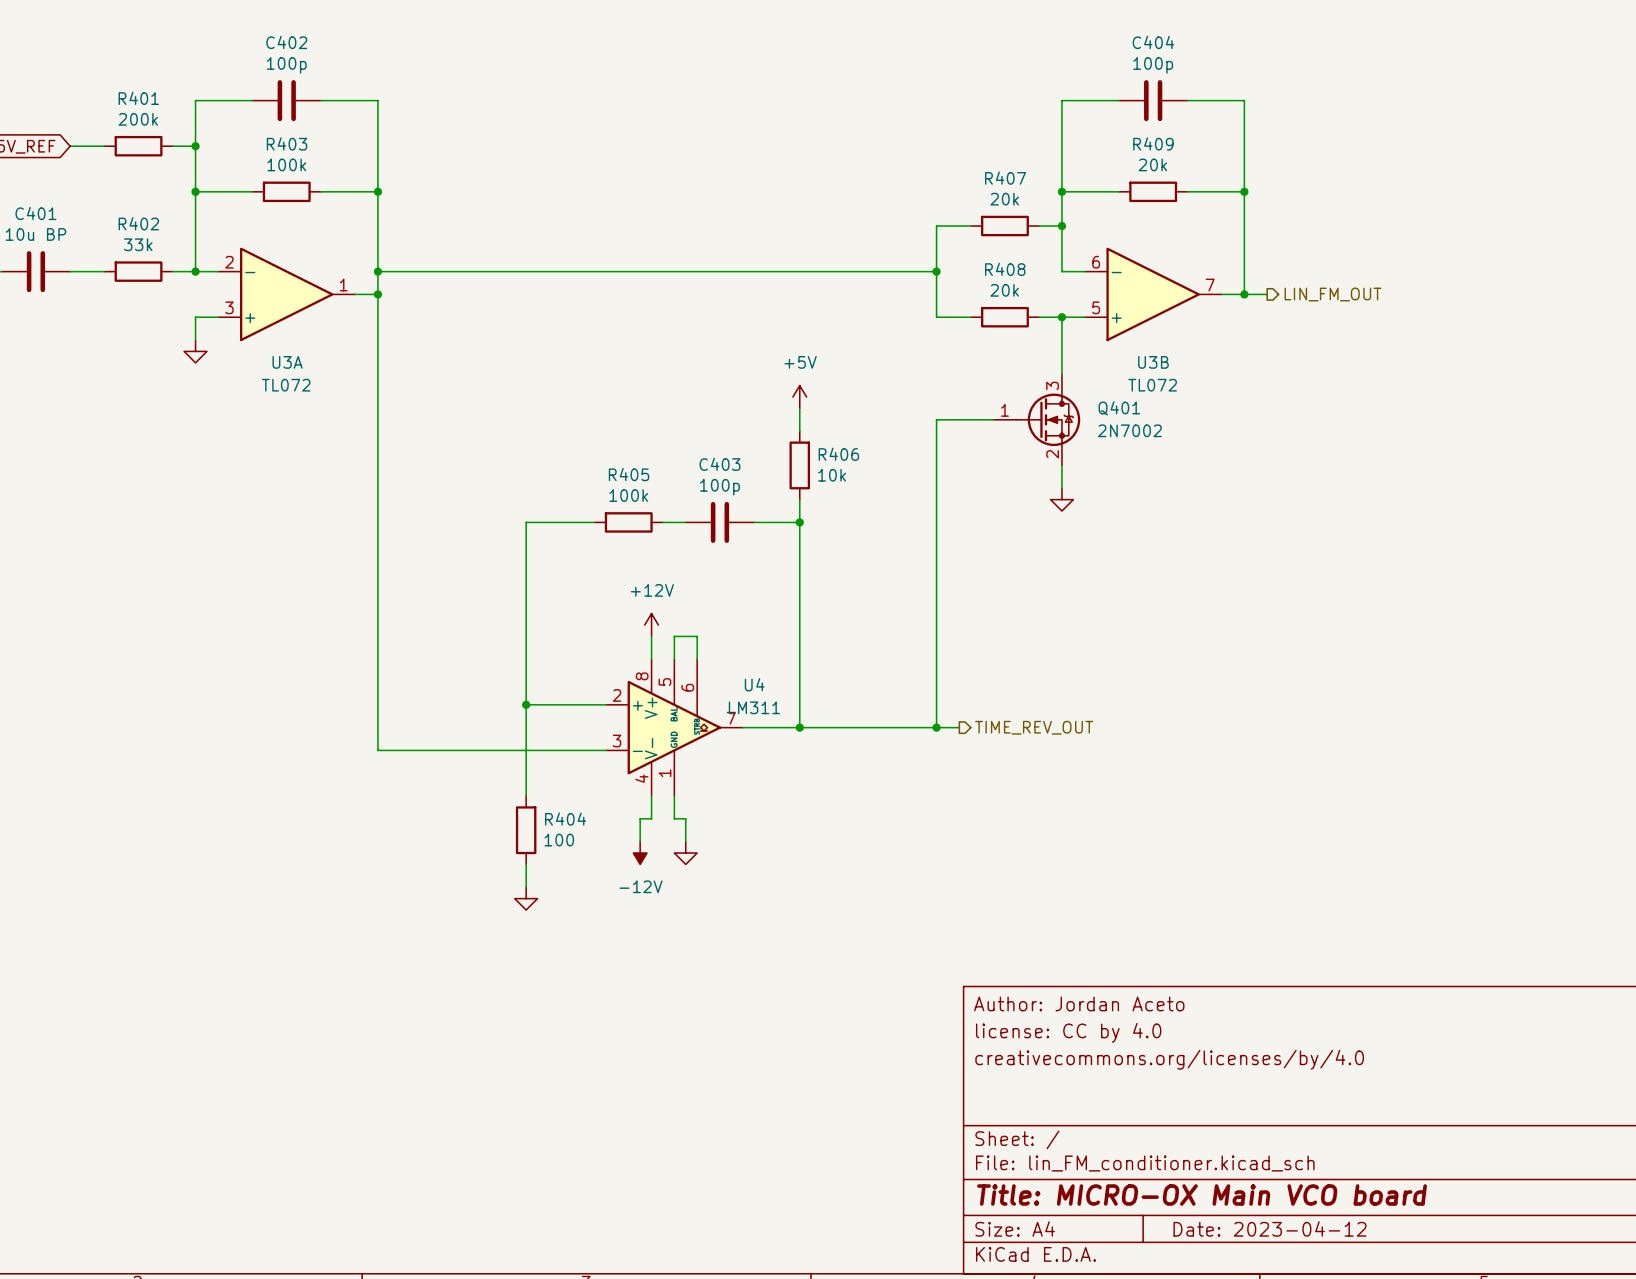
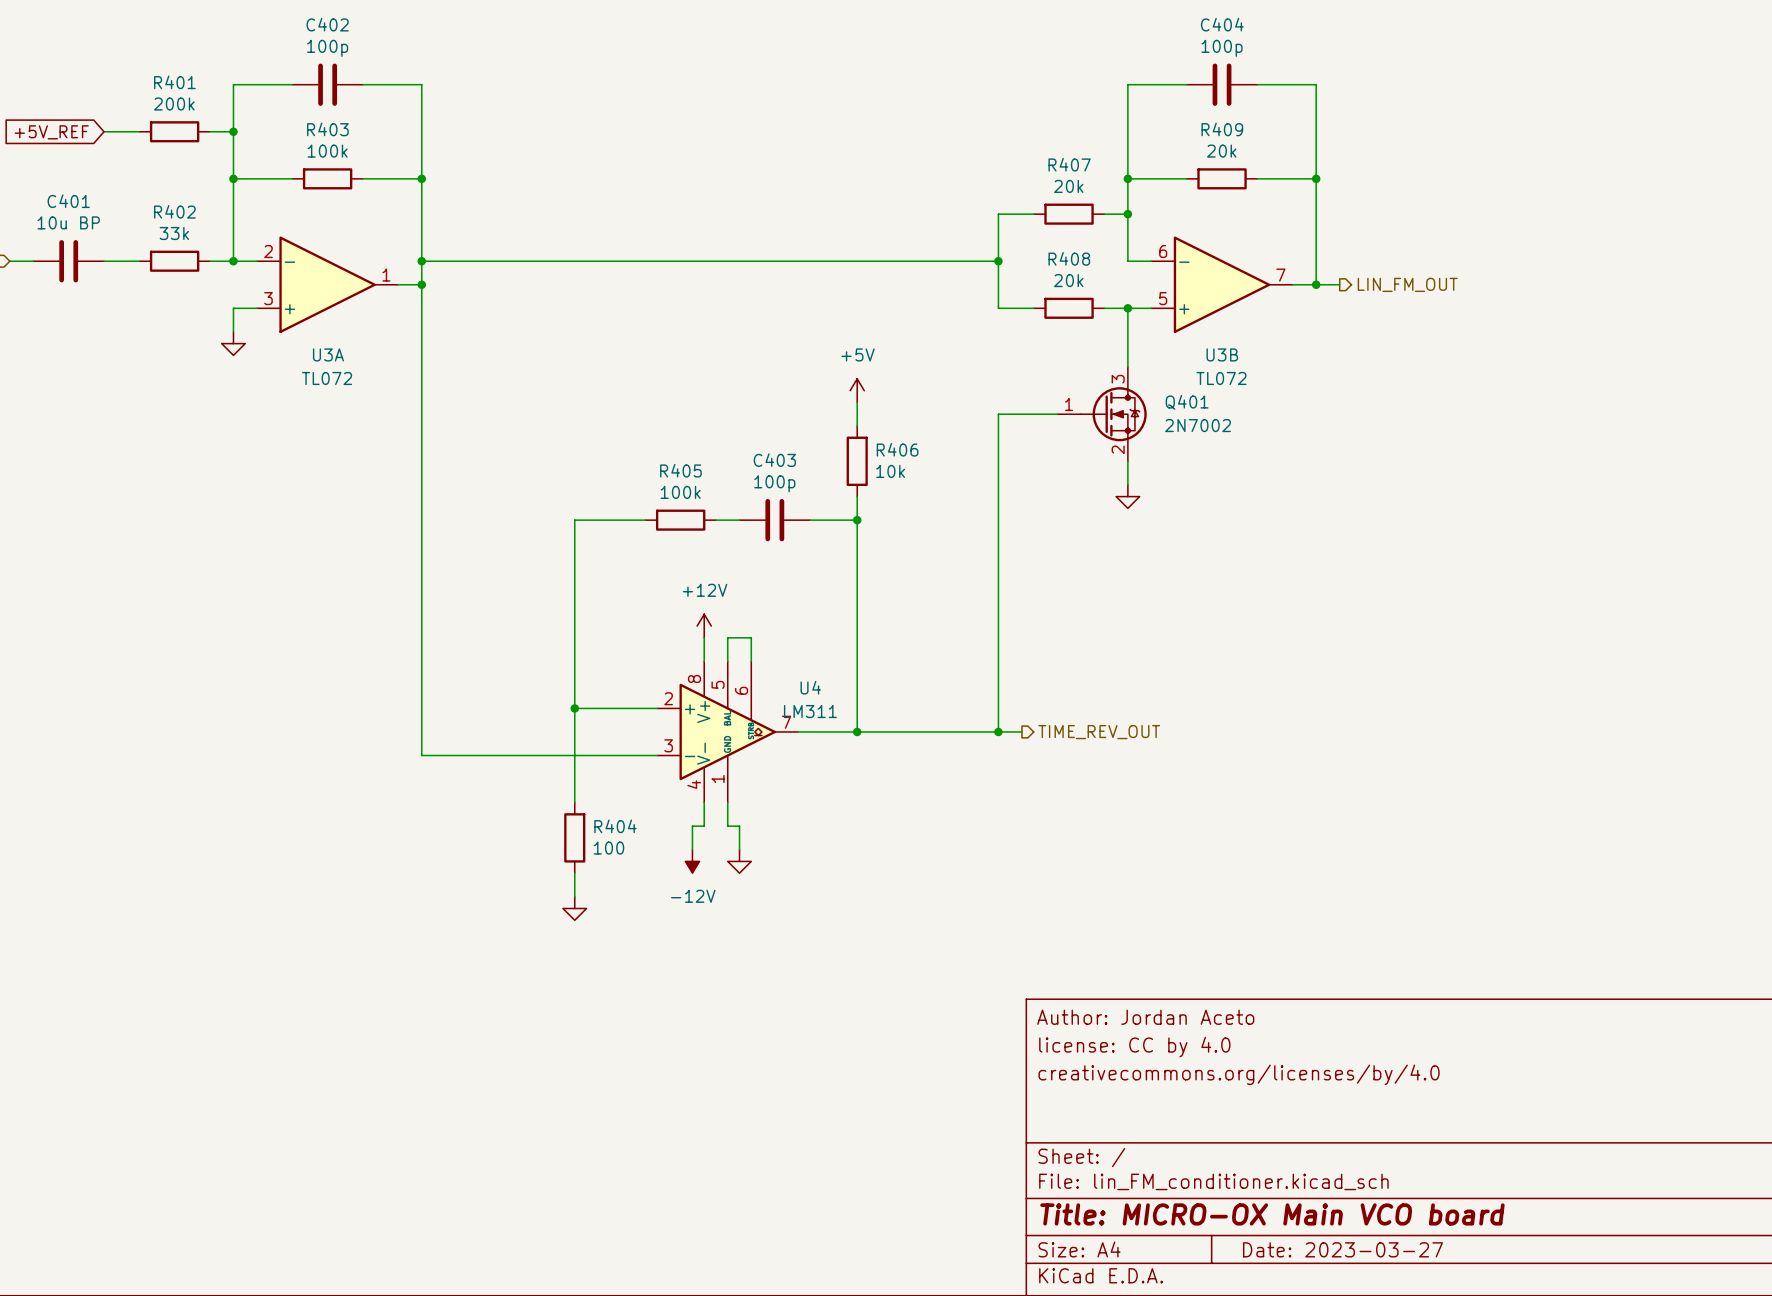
title block: Date: 2023-04-12 (1270, 1228) -> Date: 2023-03-27 (1342, 1249)

